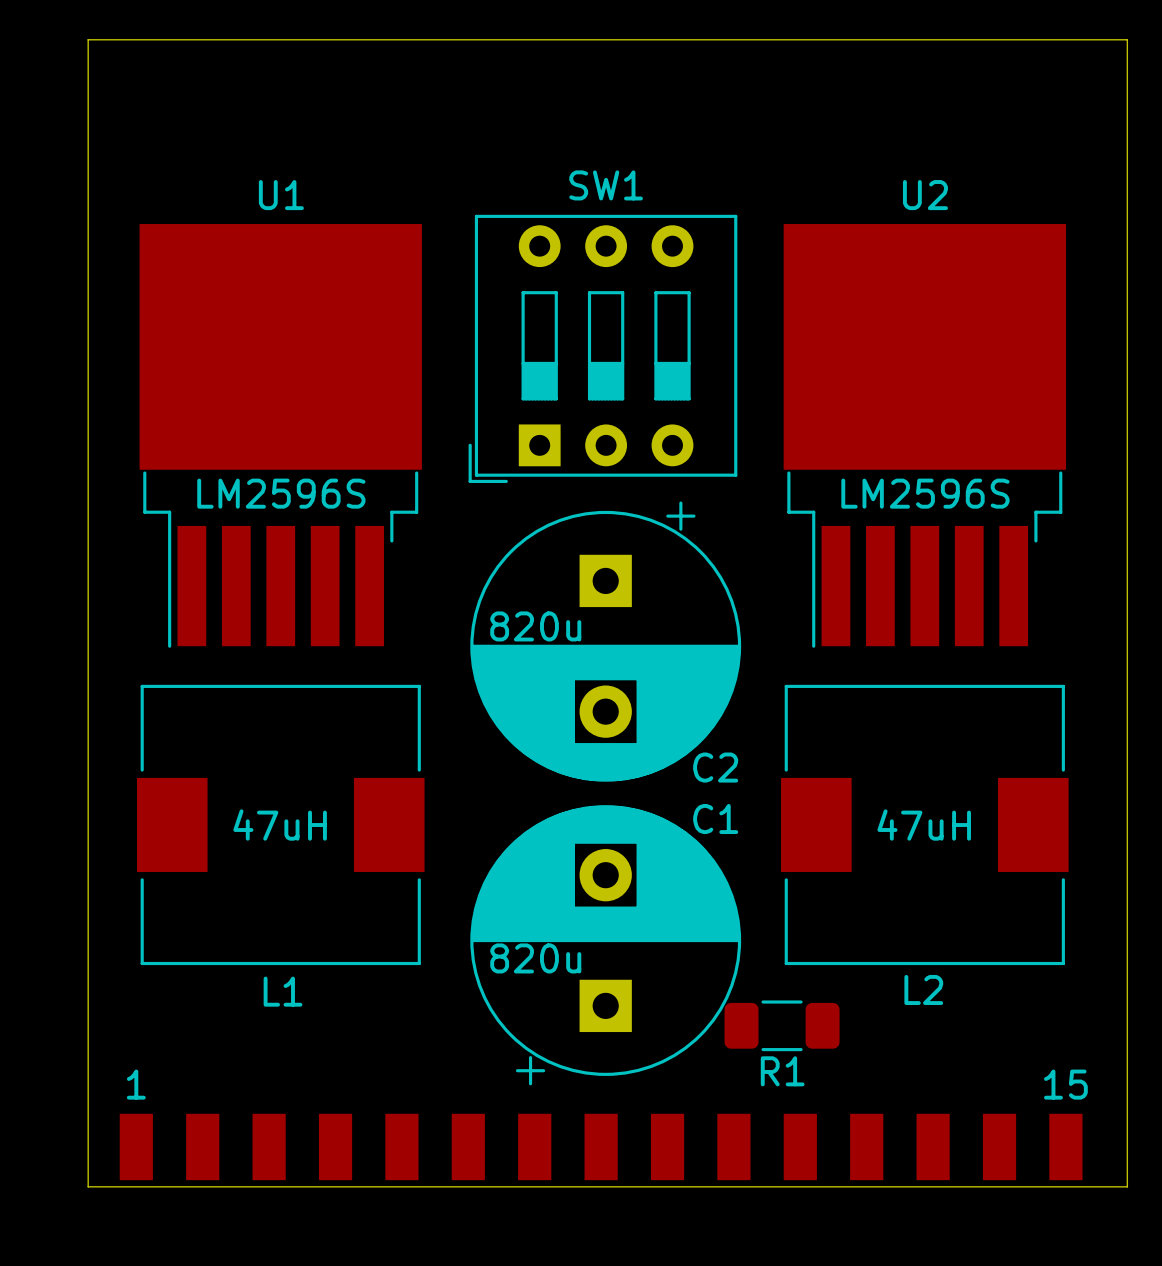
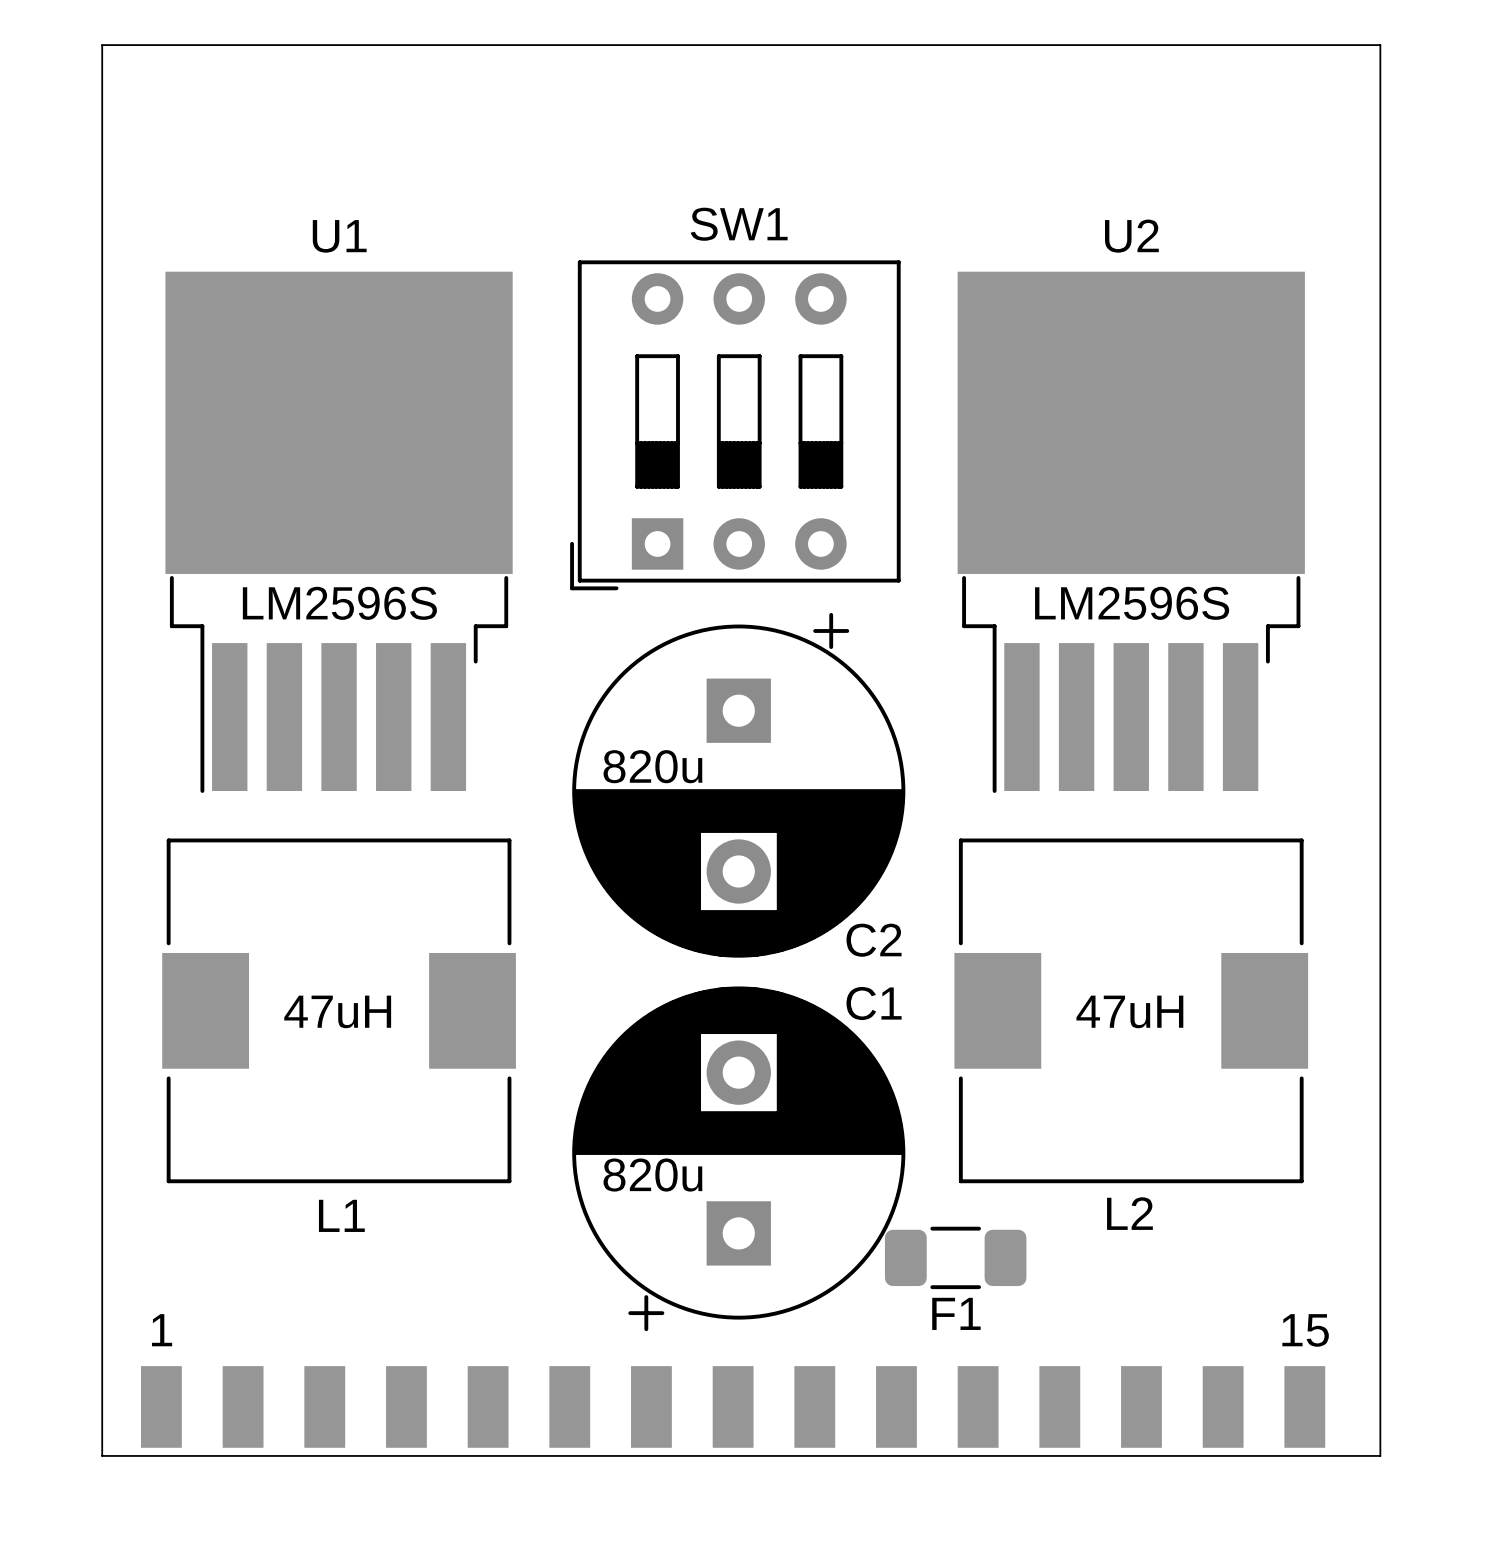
R1 name: R1 (782, 1071) -> F1 (956, 1313)

